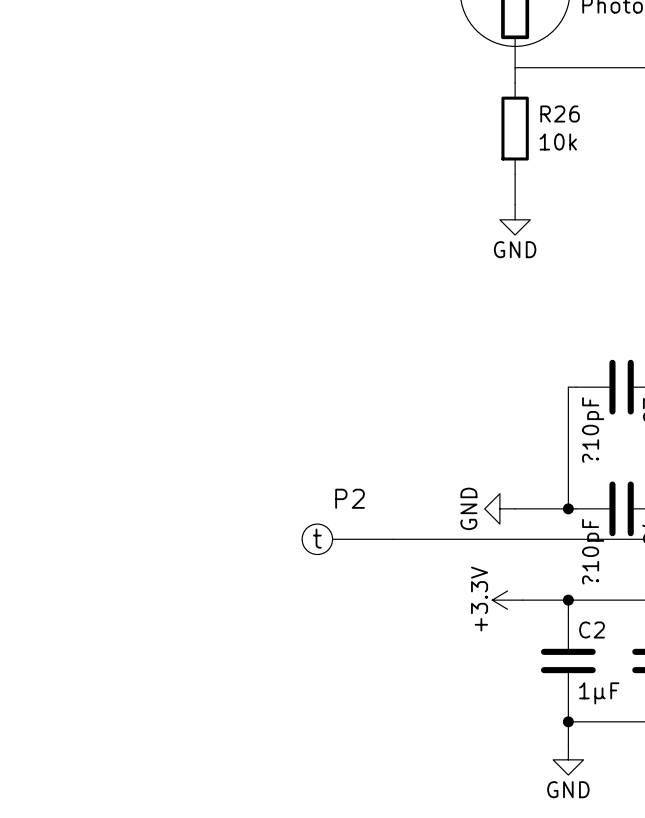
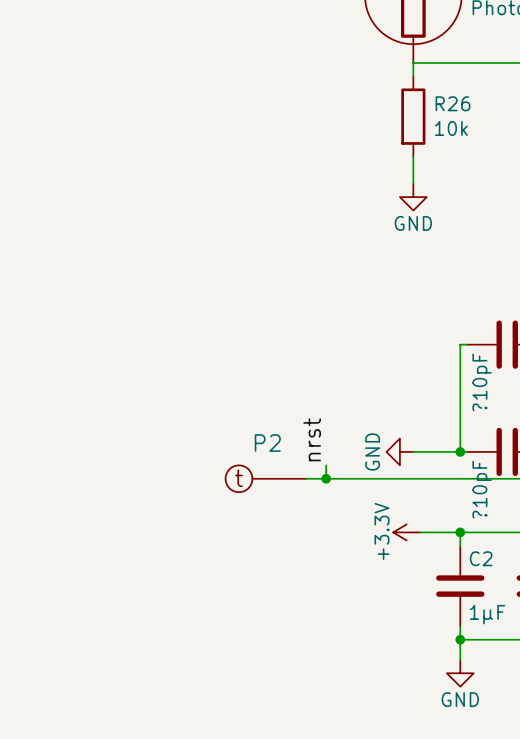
label: none -> nrst (312, 439)
wire: none -> (326, 465) (326, 478)
junction: none -> (326, 478)

